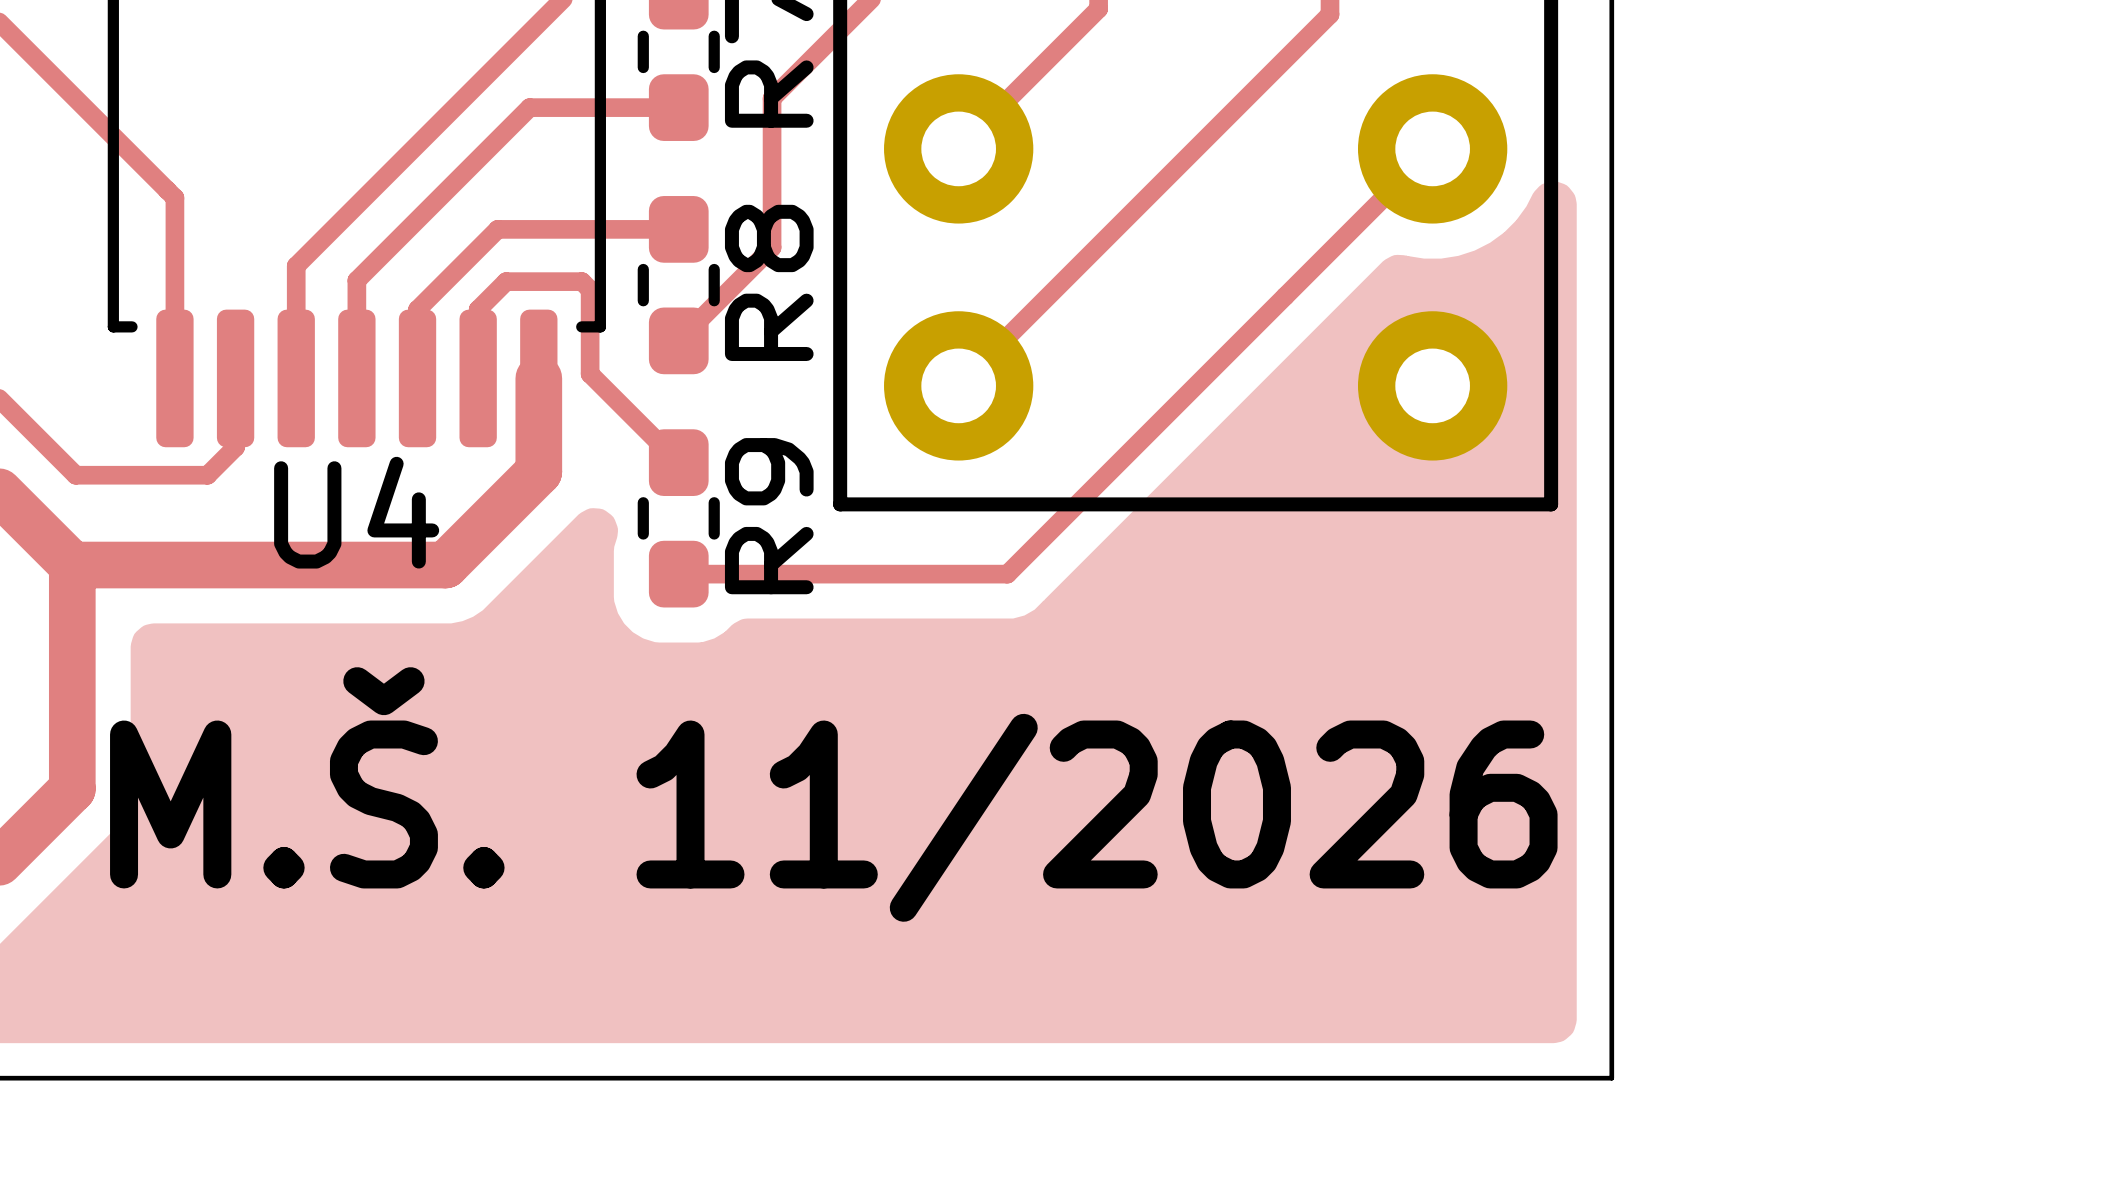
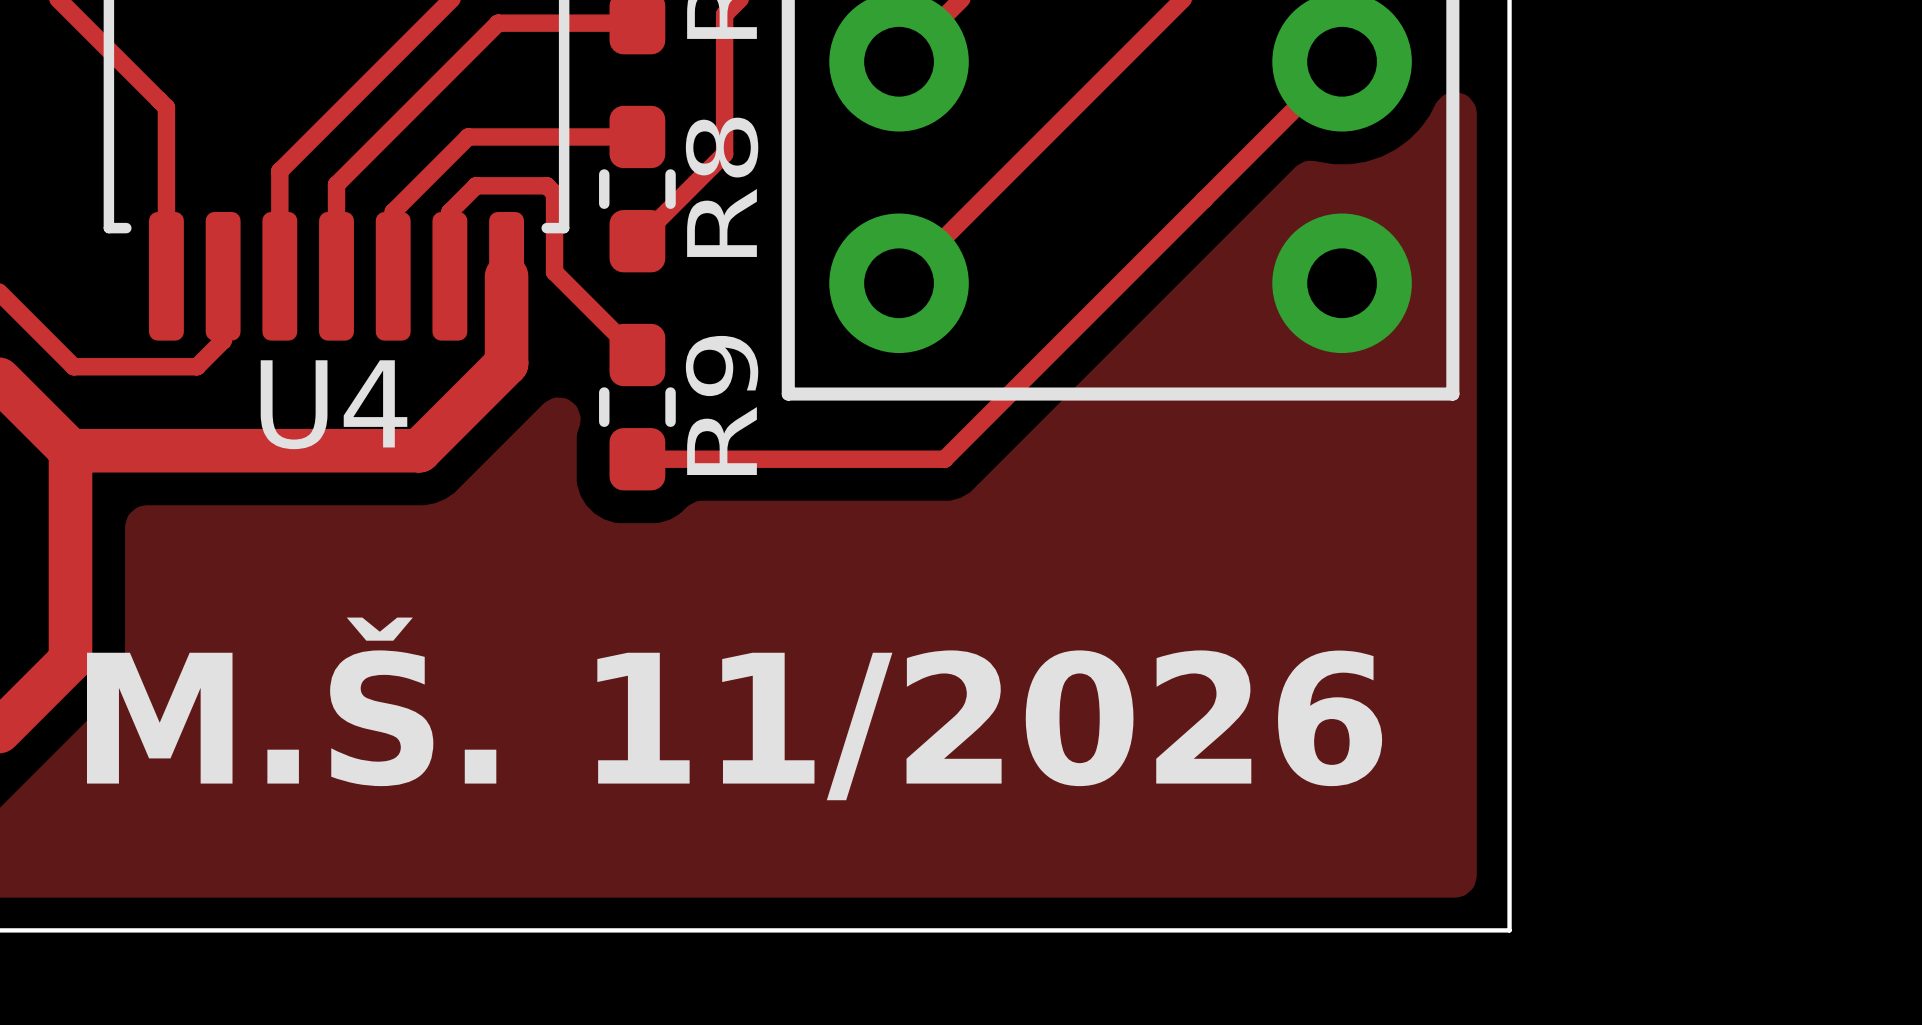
text position: M.Š. 11/2026 (833, 794) -> M.Š. 11/2026 (734, 708)

